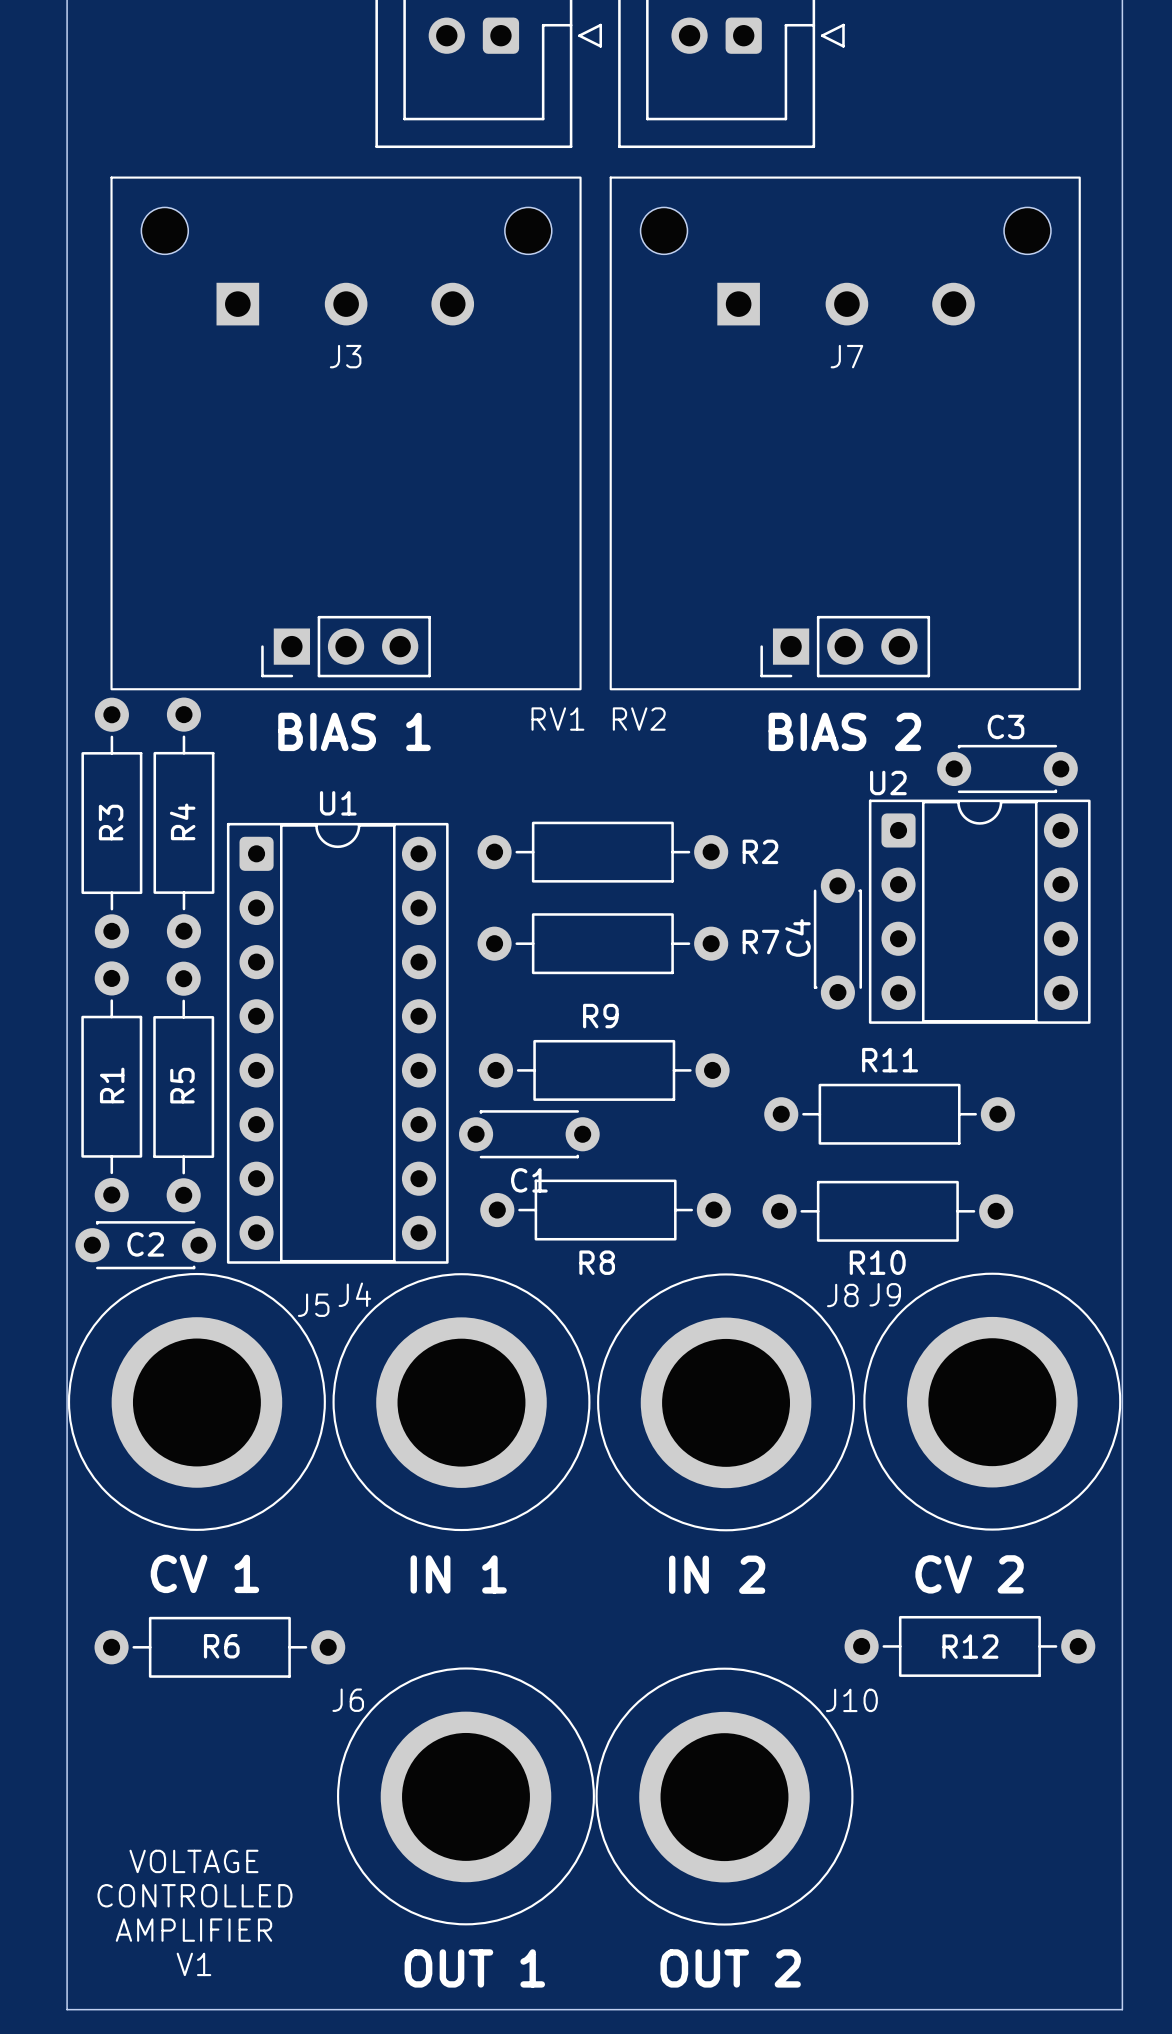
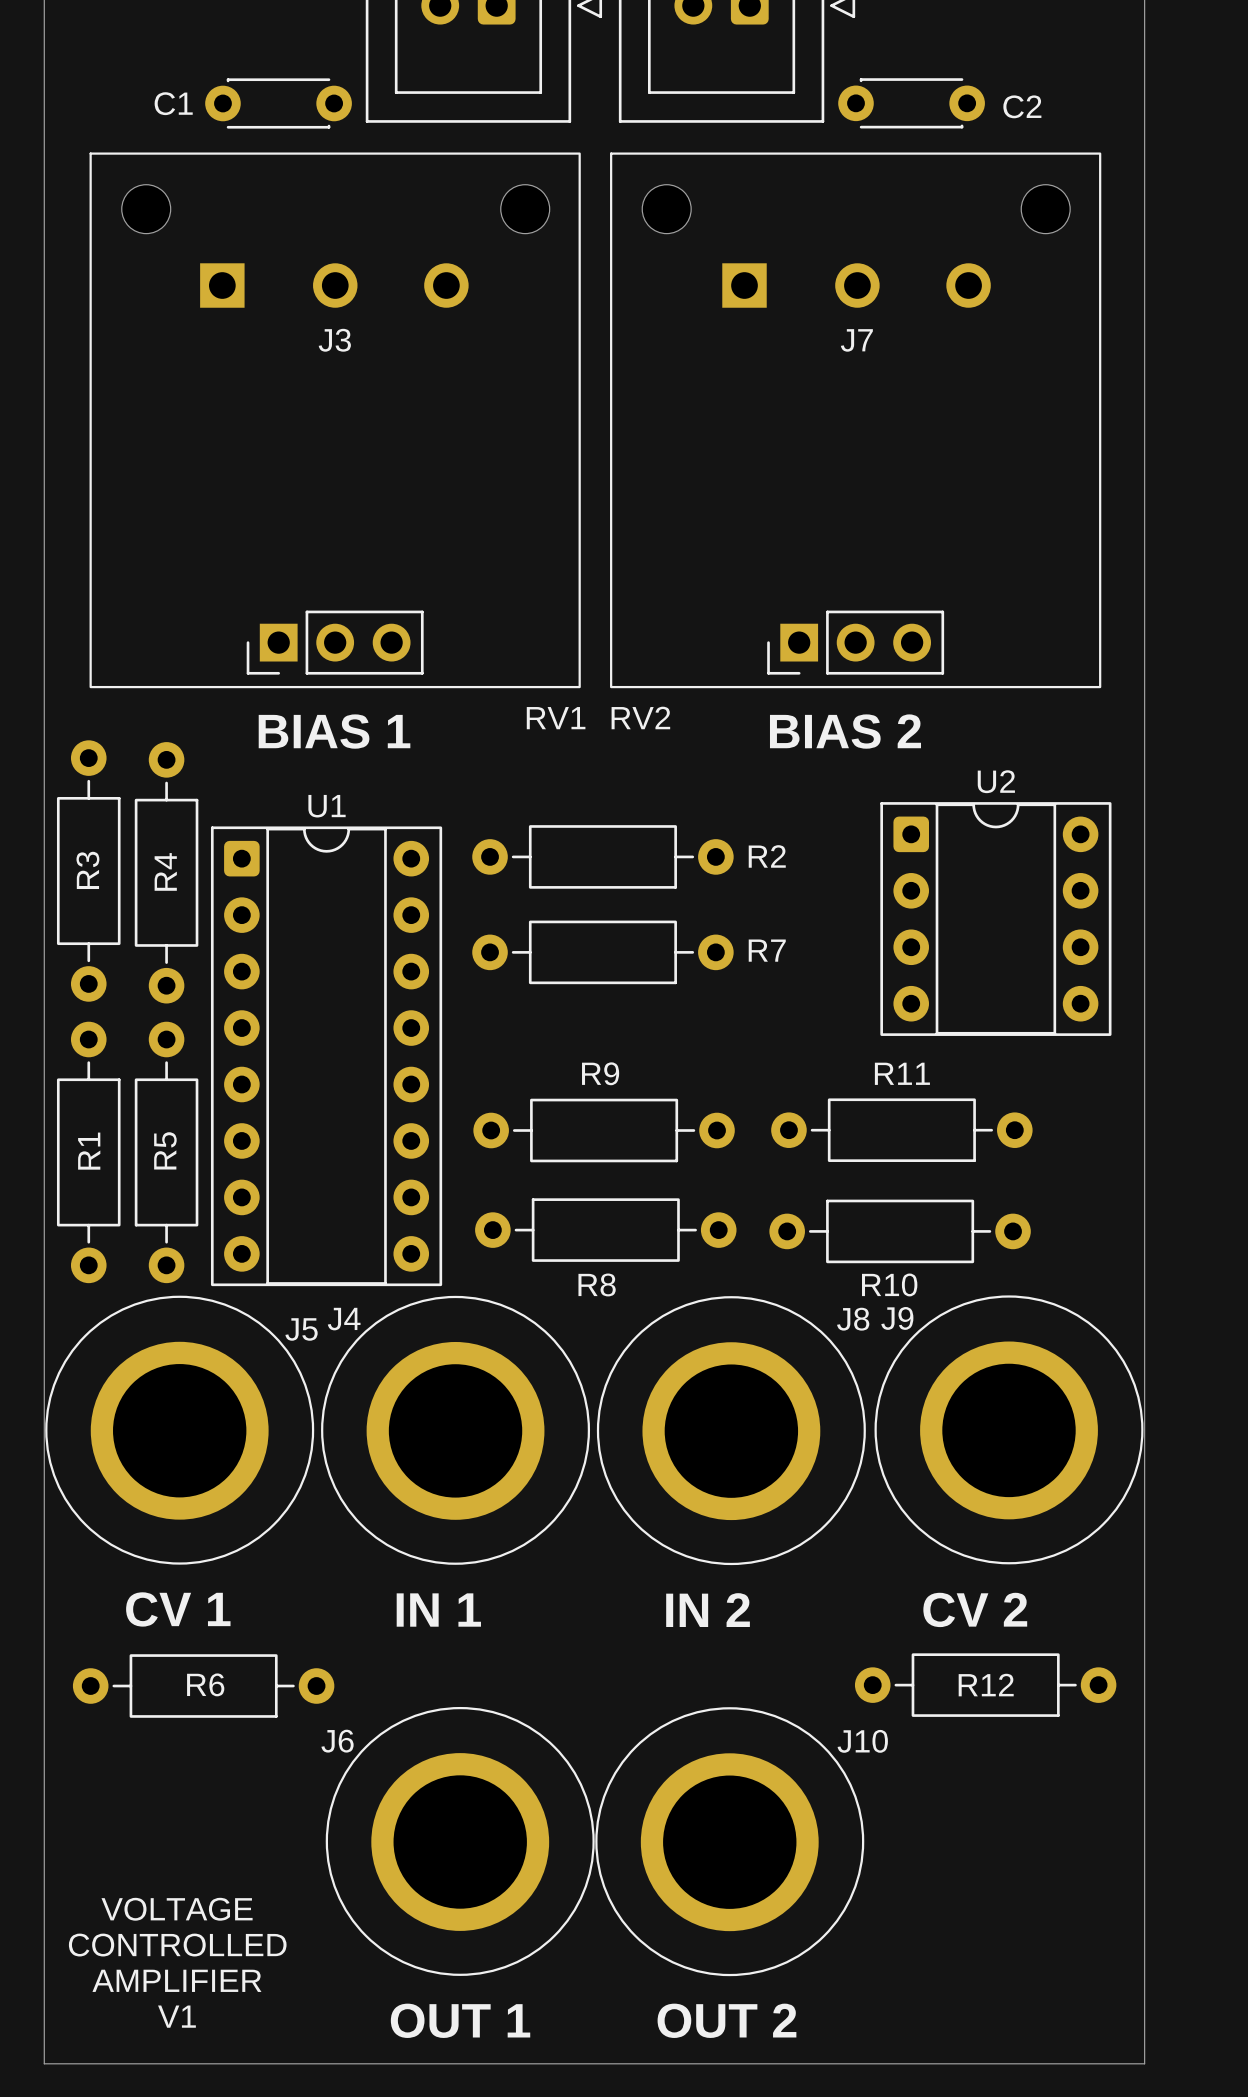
C3: (1007, 768) -> none
U2 name position: U2 (888, 783) -> U2 (996, 781)
R4 position: (183, 822) -> (166, 872)
R3 position: (111, 823) -> (88, 871)
C4: (837, 939) -> none
R9 position: (604, 1070) -> (604, 1130)
R1 position: (111, 1086) -> (88, 1152)
R5 position: (183, 1087) -> (166, 1152)
C1 position: (529, 1134) -> (278, 103)
C1 name position: C1 (529, 1180) -> C1 (173, 103)
C2 name position: C2 (145, 1244) -> C2 (1022, 106)
C2 position: (145, 1245) -> (911, 103)

